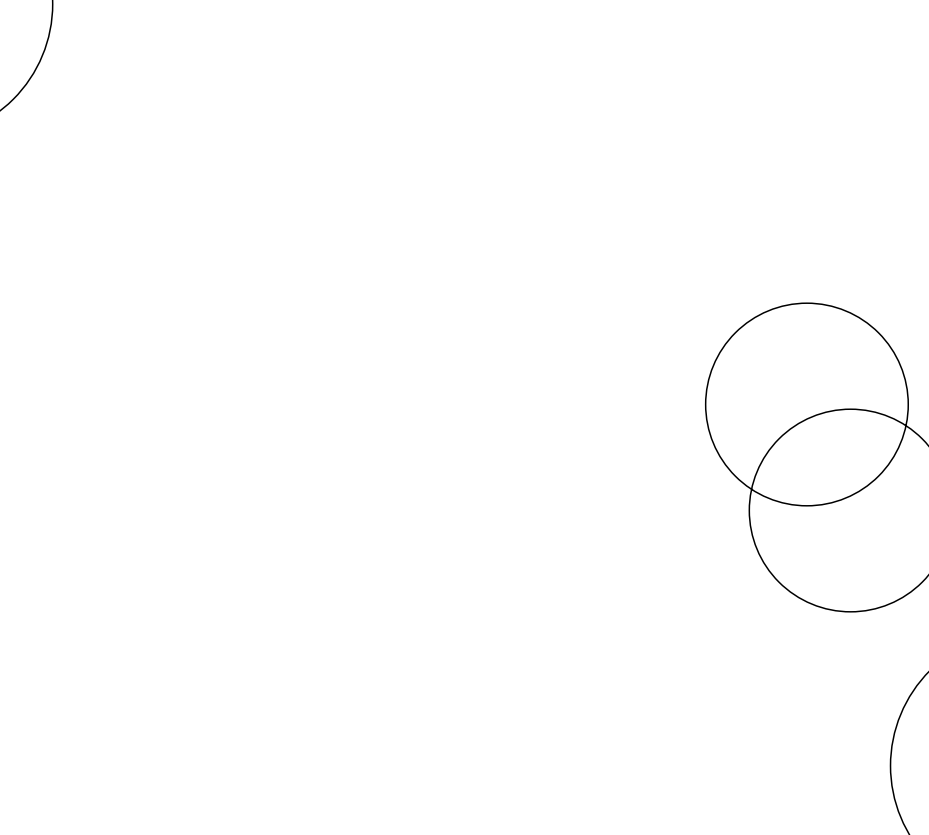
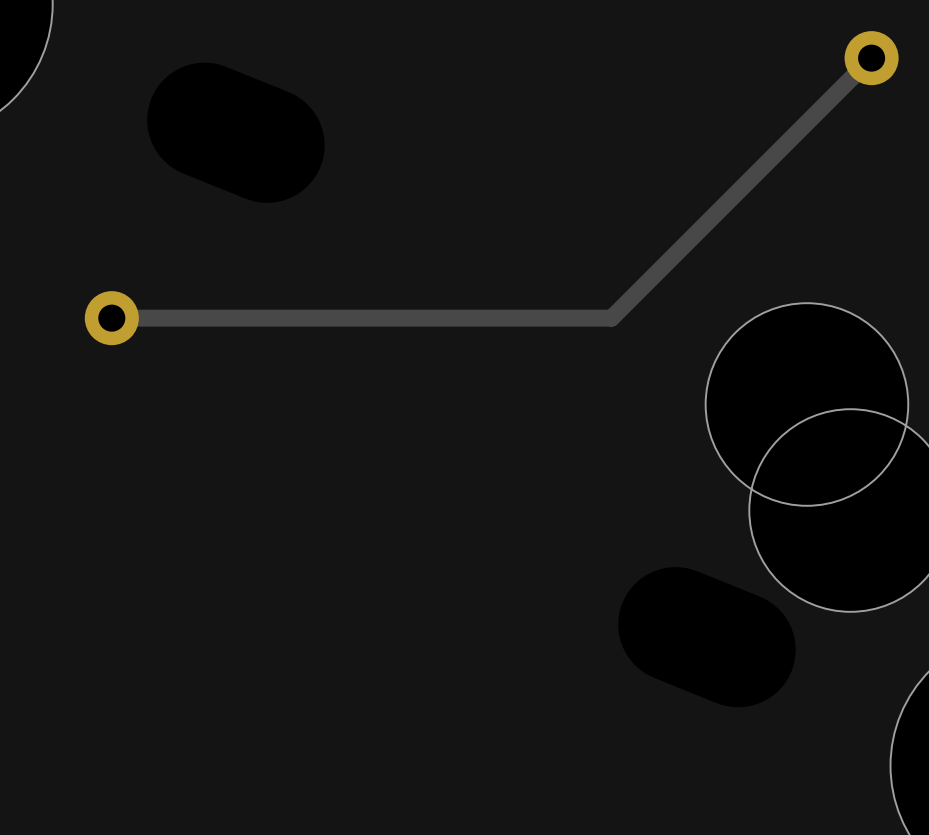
track: none -> (871, 58) (611, 318) (111, 318)
via: none -> (871, 58)
via: none -> (111, 318)

